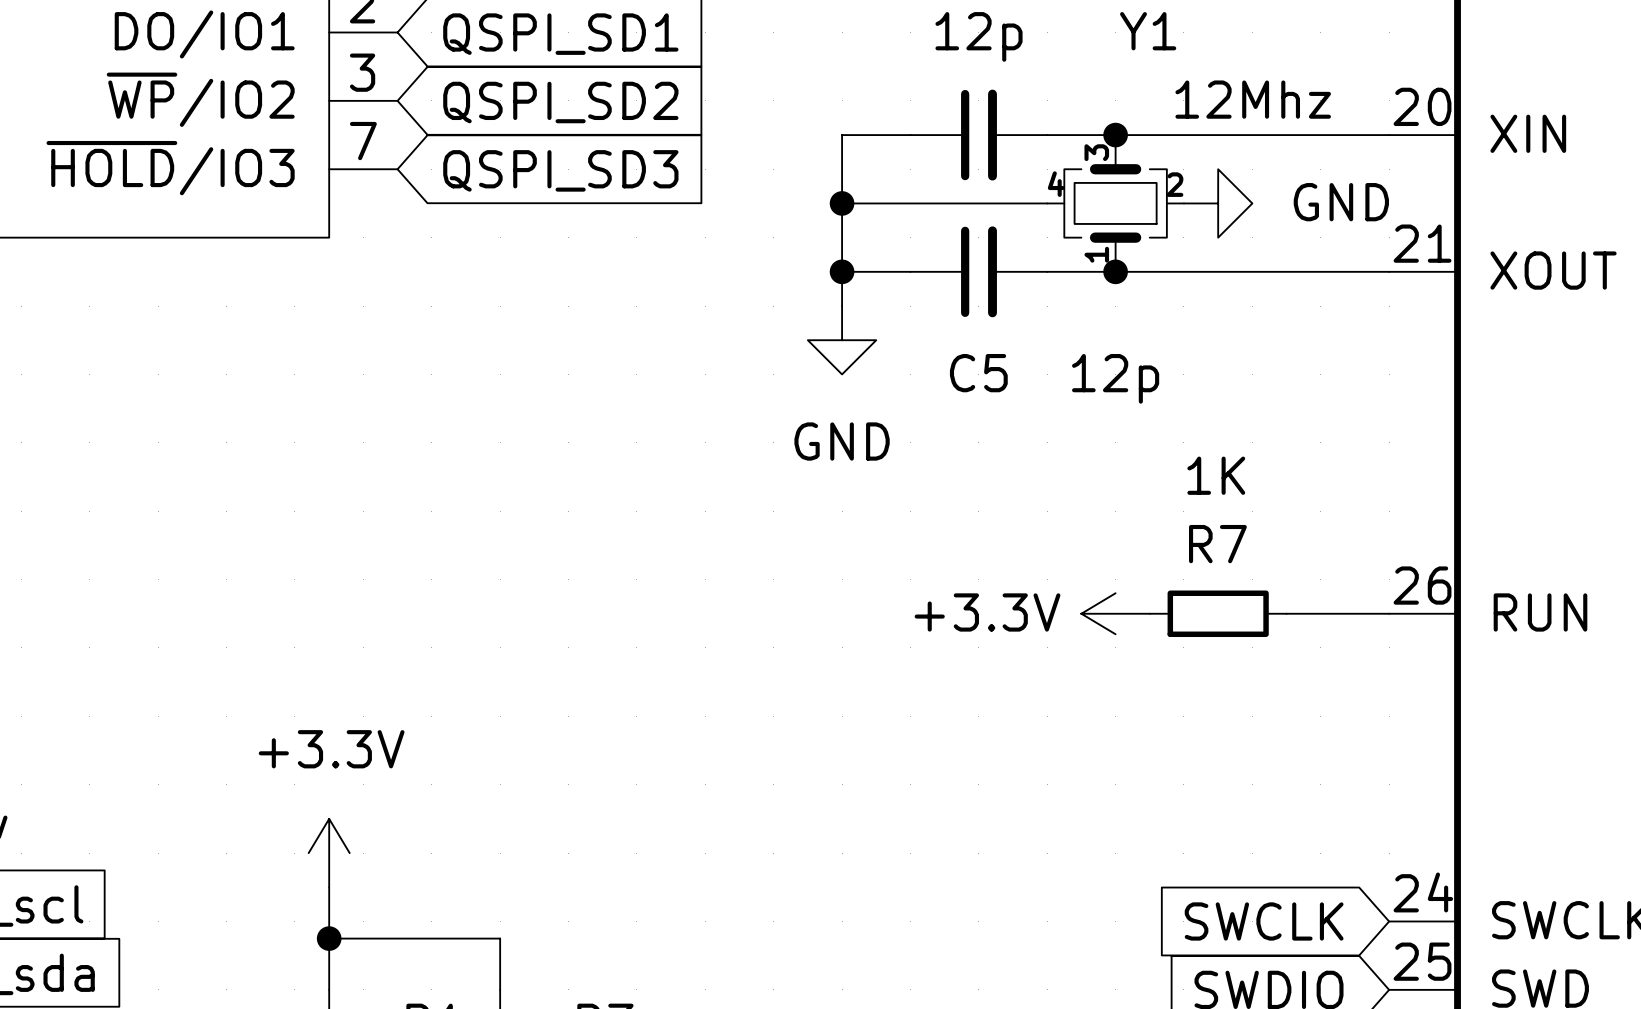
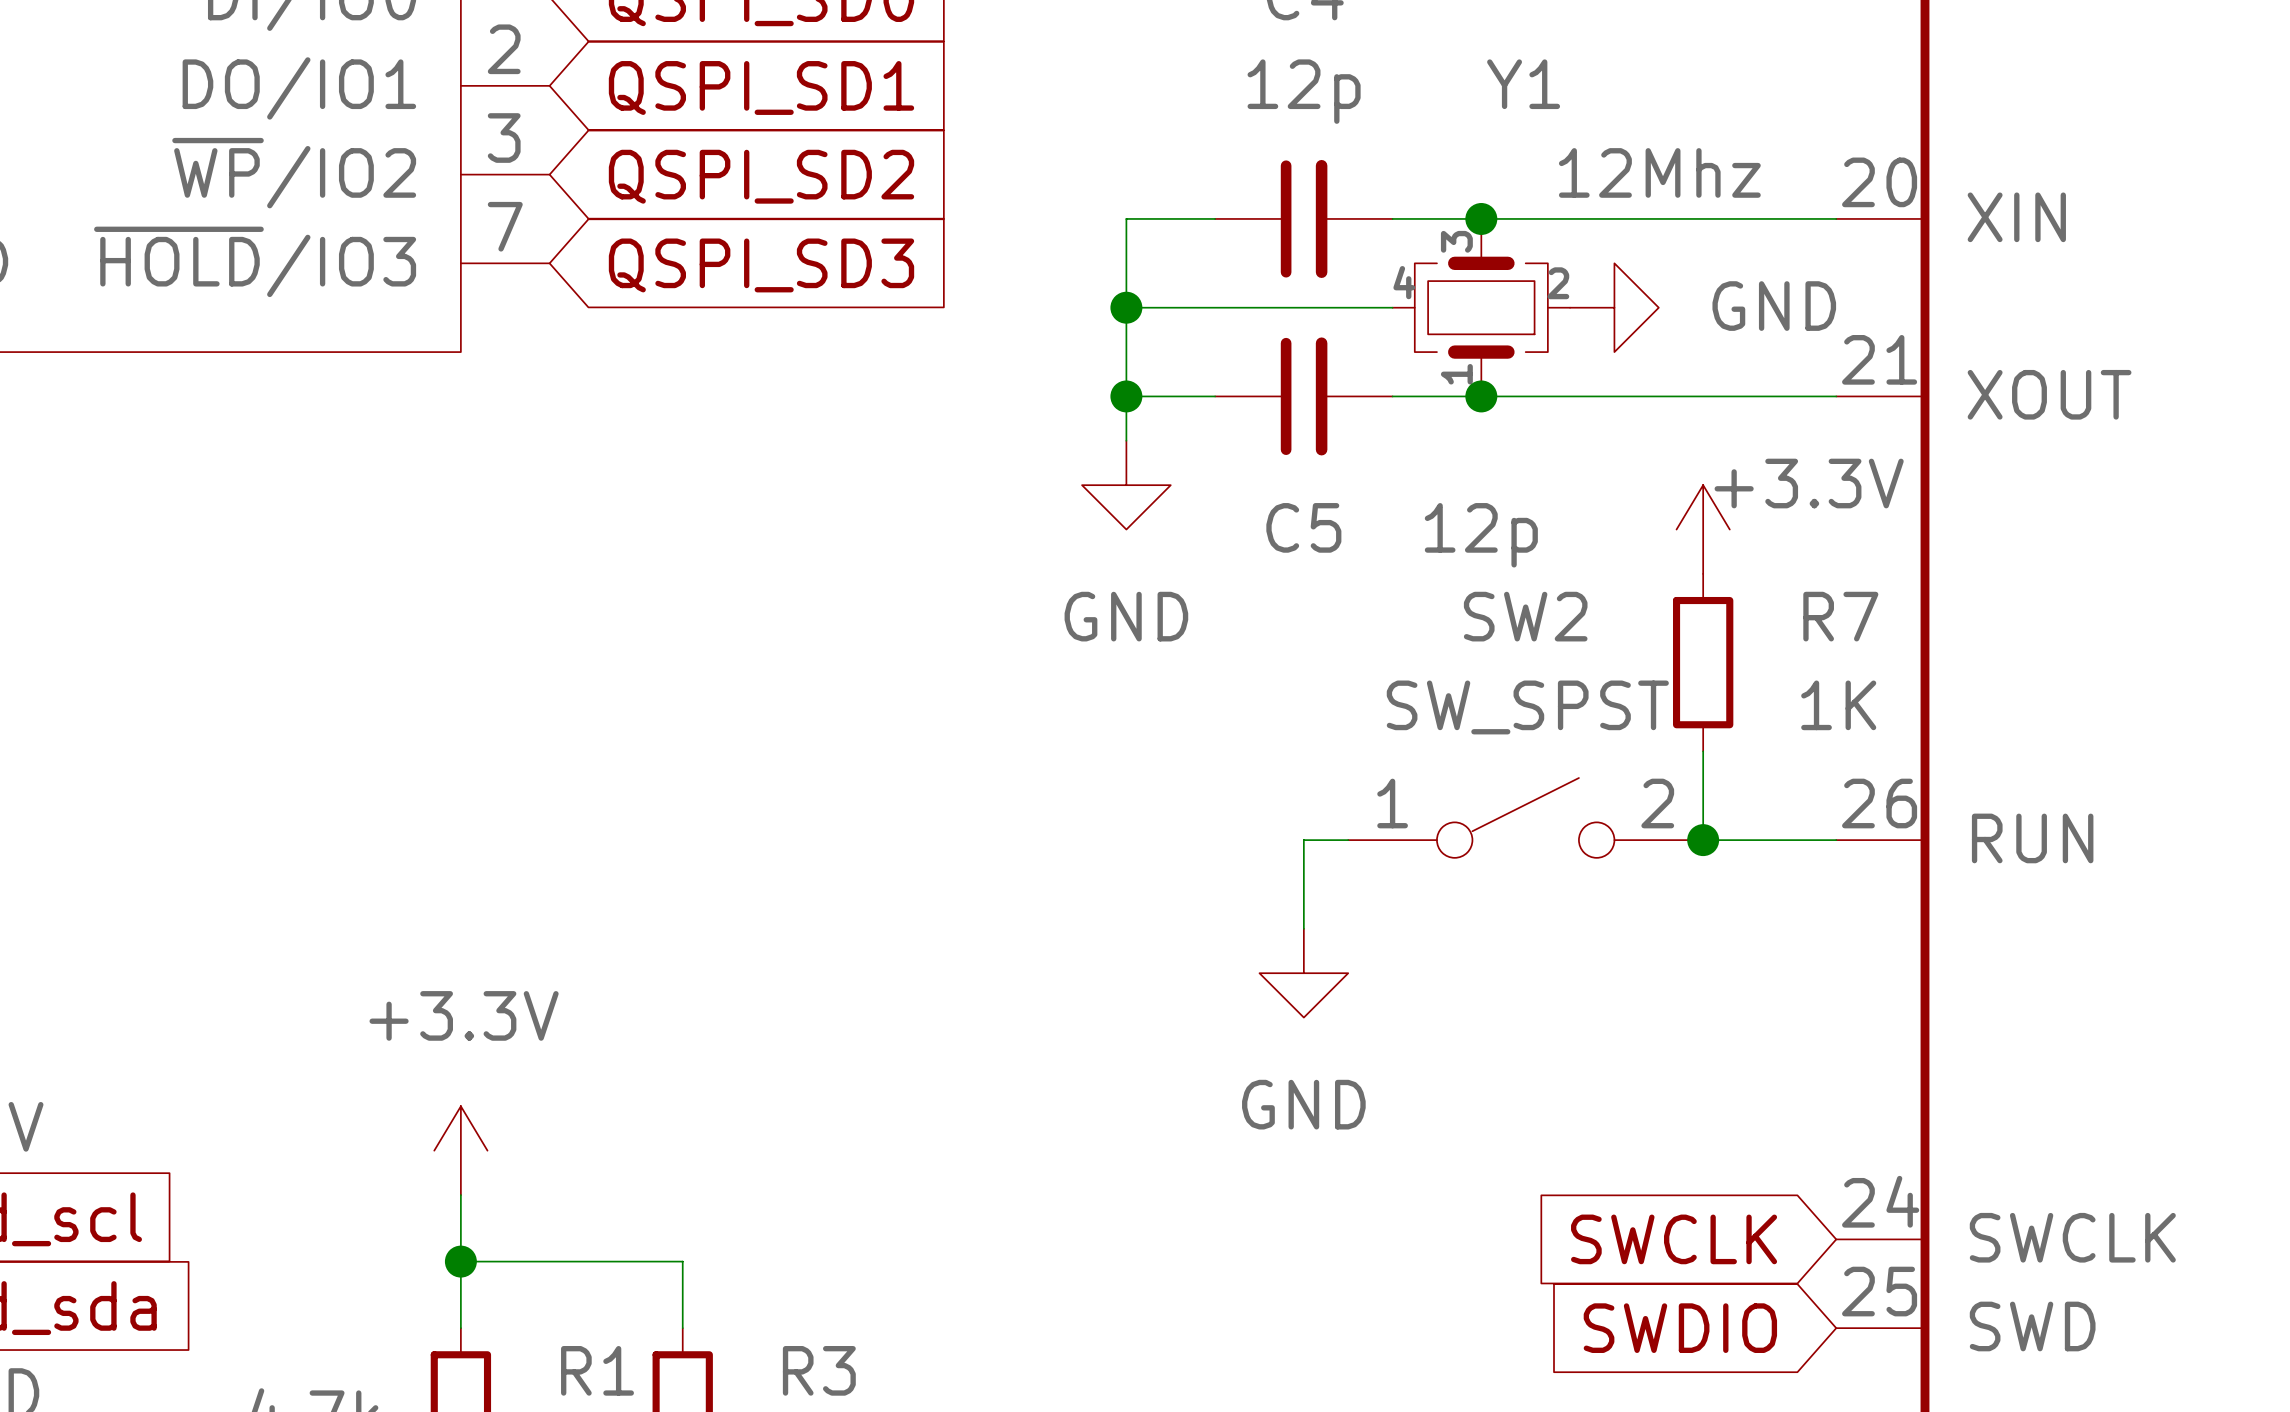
wire: none -> (1703, 751) (1703, 840)
SW2: none -> SW_SPST (1525, 817)
power symbol text position: +3.3V (987, 612) -> +3.3V (1809, 483)
wire: none -> (1348, 840) (1303, 840) (1303, 928)
power symbol rotation: 0° (1115, 613) -> 90° clockwise (1703, 529)
power symbol position: +3.3V (1115, 613) -> +3.3V (1703, 529)
R7 rotation: 0° (1218, 613) -> 90° clockwise (1703, 662)
R7 position: (1218, 613) -> (1703, 662)
junction: none -> (1703, 840)
power symbol: none -> GND (1303, 973)

